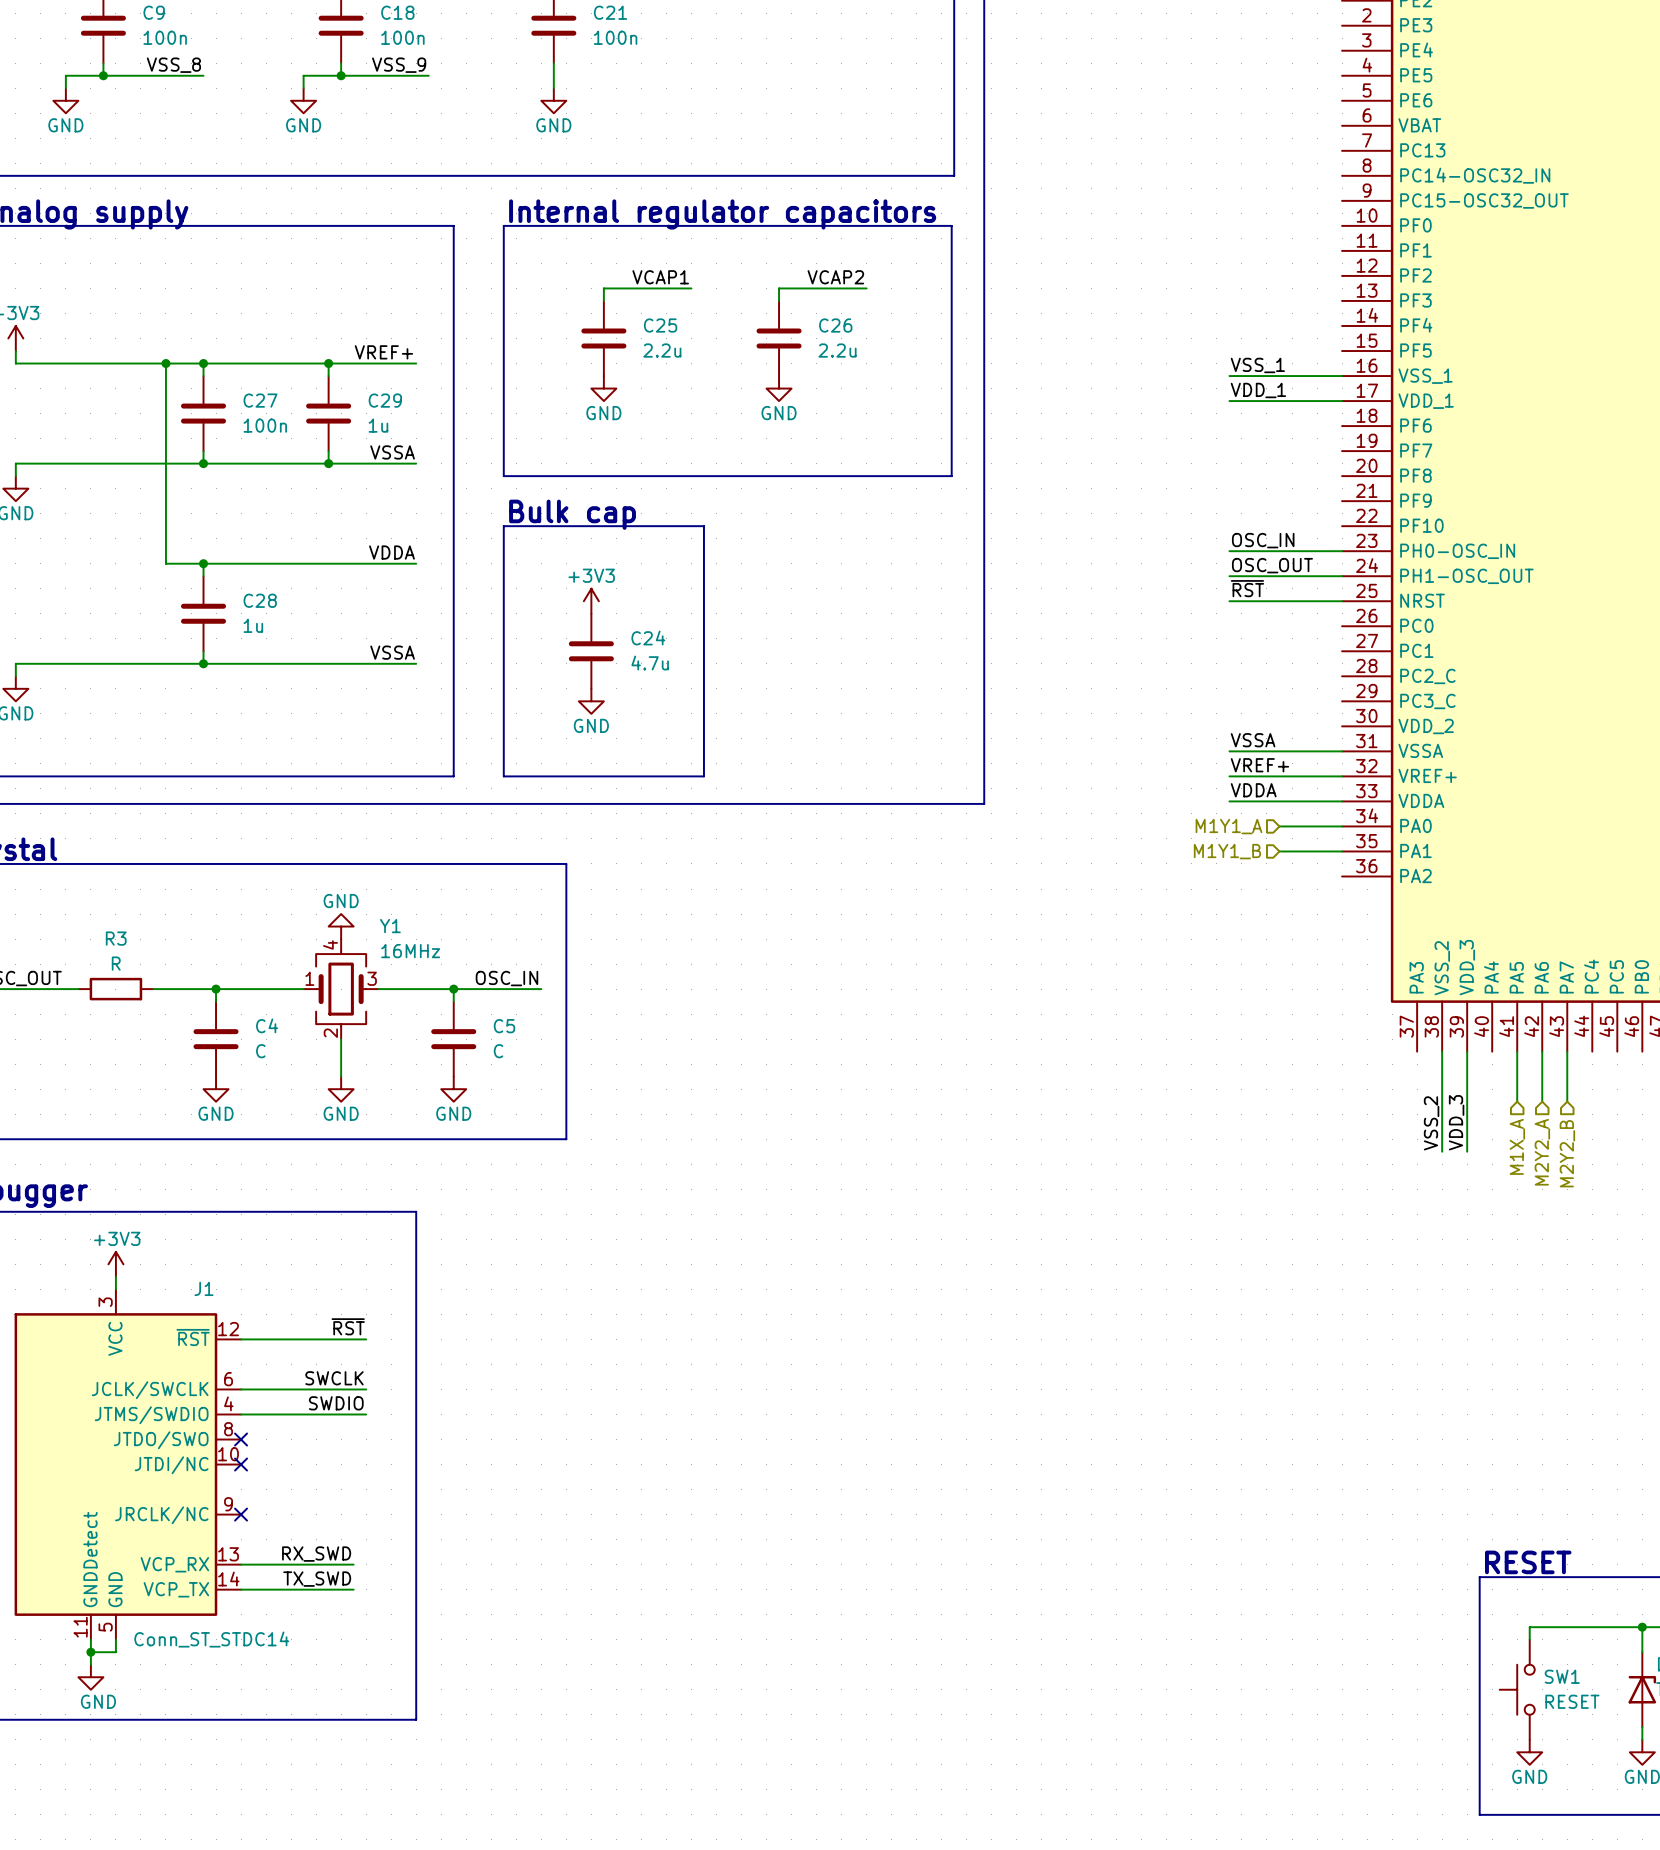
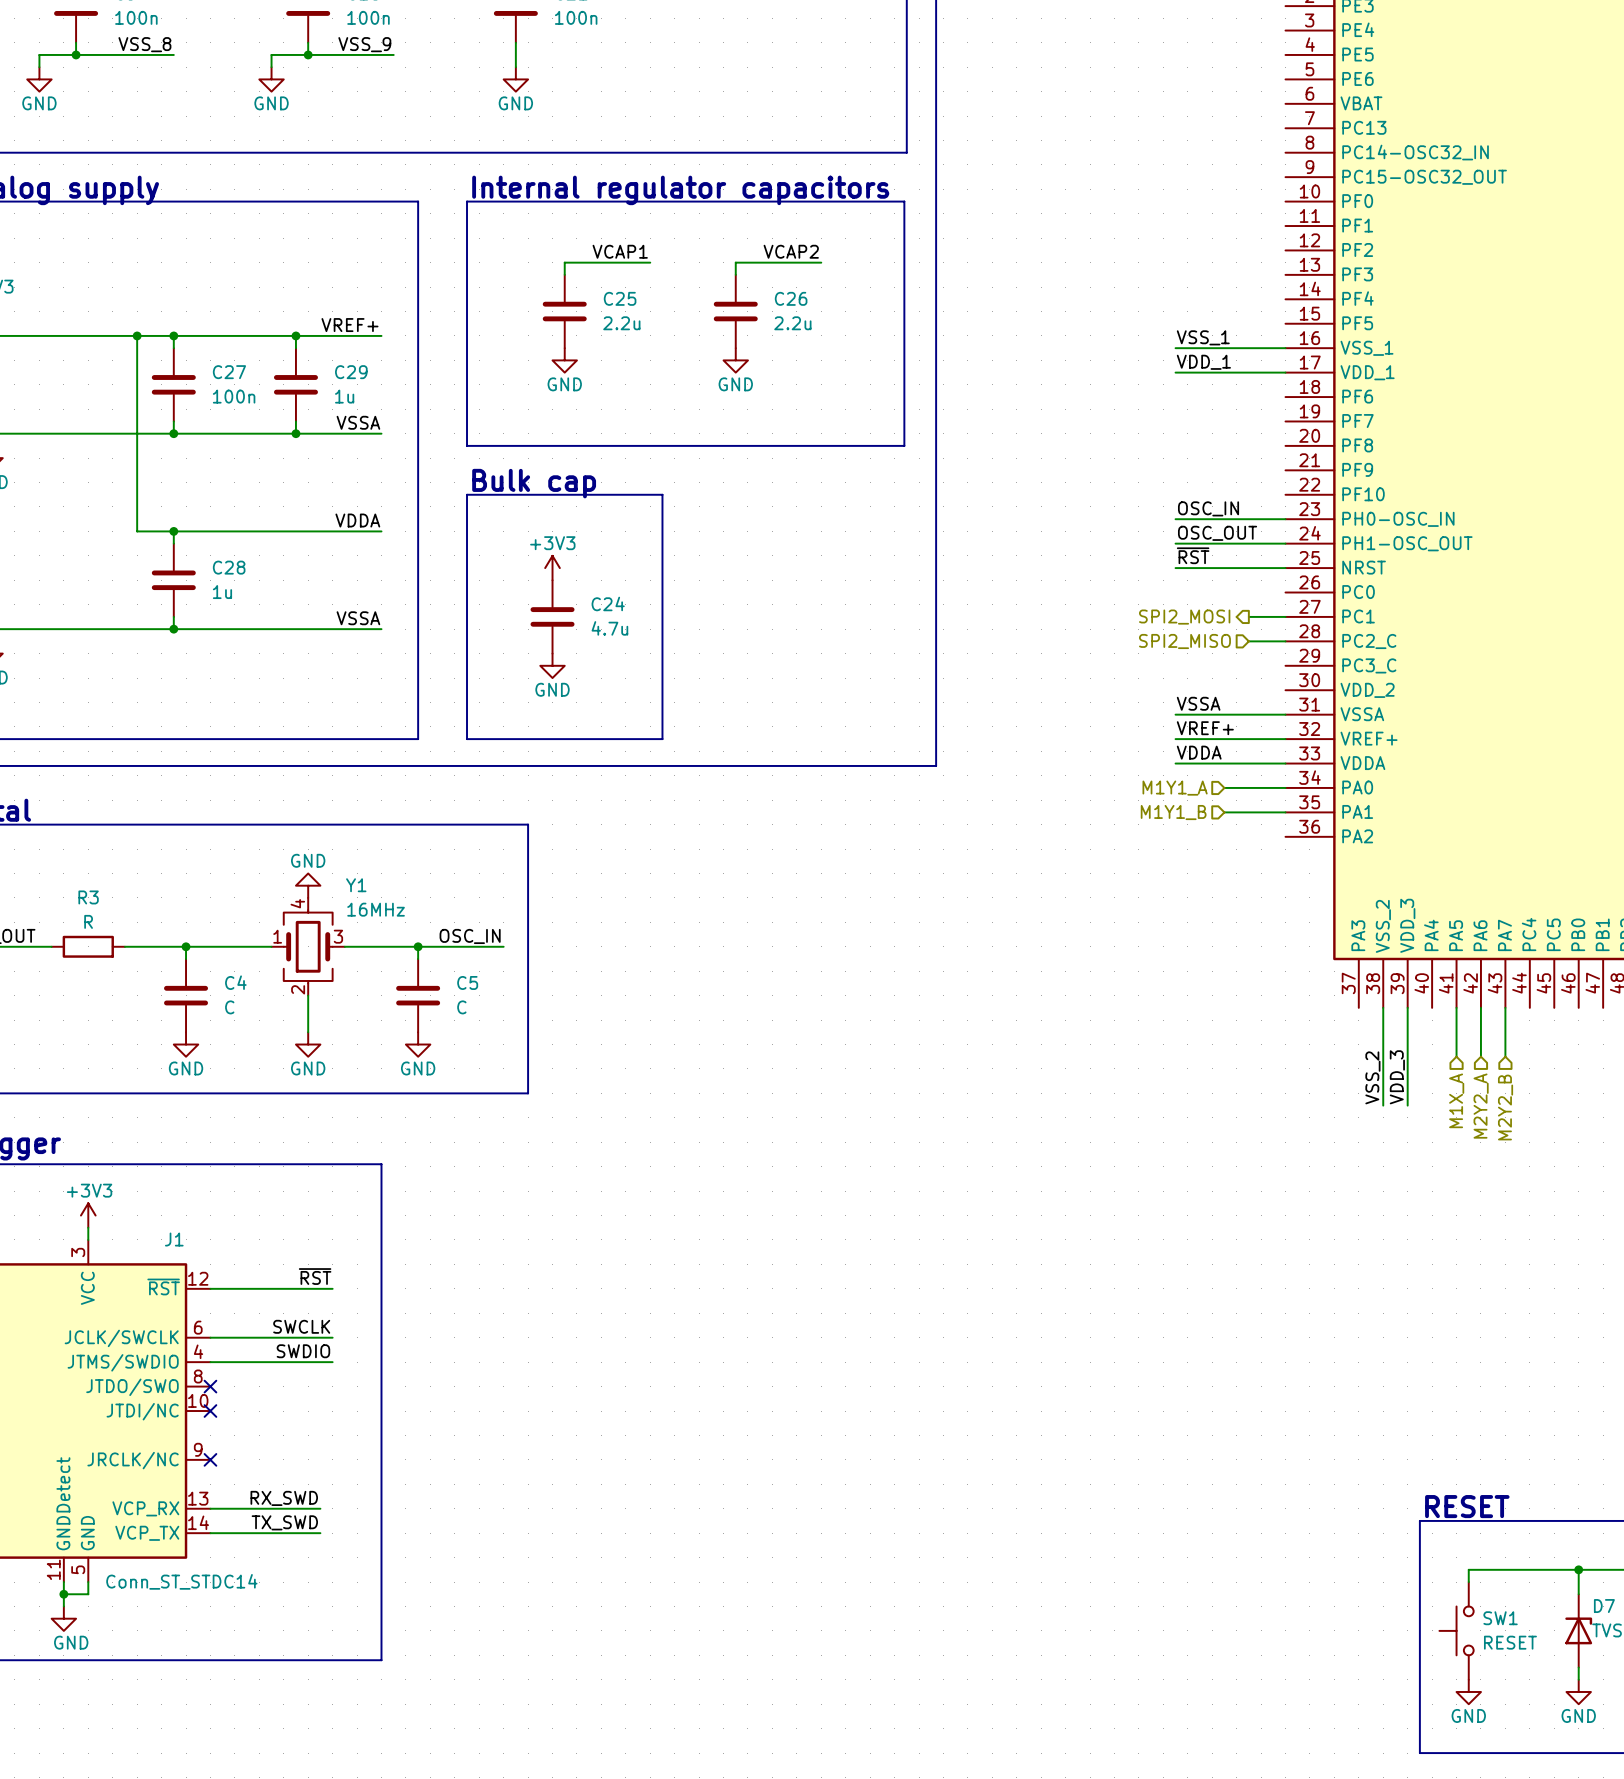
hierarchical label: none -> SPI2_MOSI (1184, 617)
wire: none -> (1248, 616) (1285, 616)
hierarchical label: none -> SPI2_MISO (1184, 641)
wire: none -> (1248, 641) (1285, 641)

